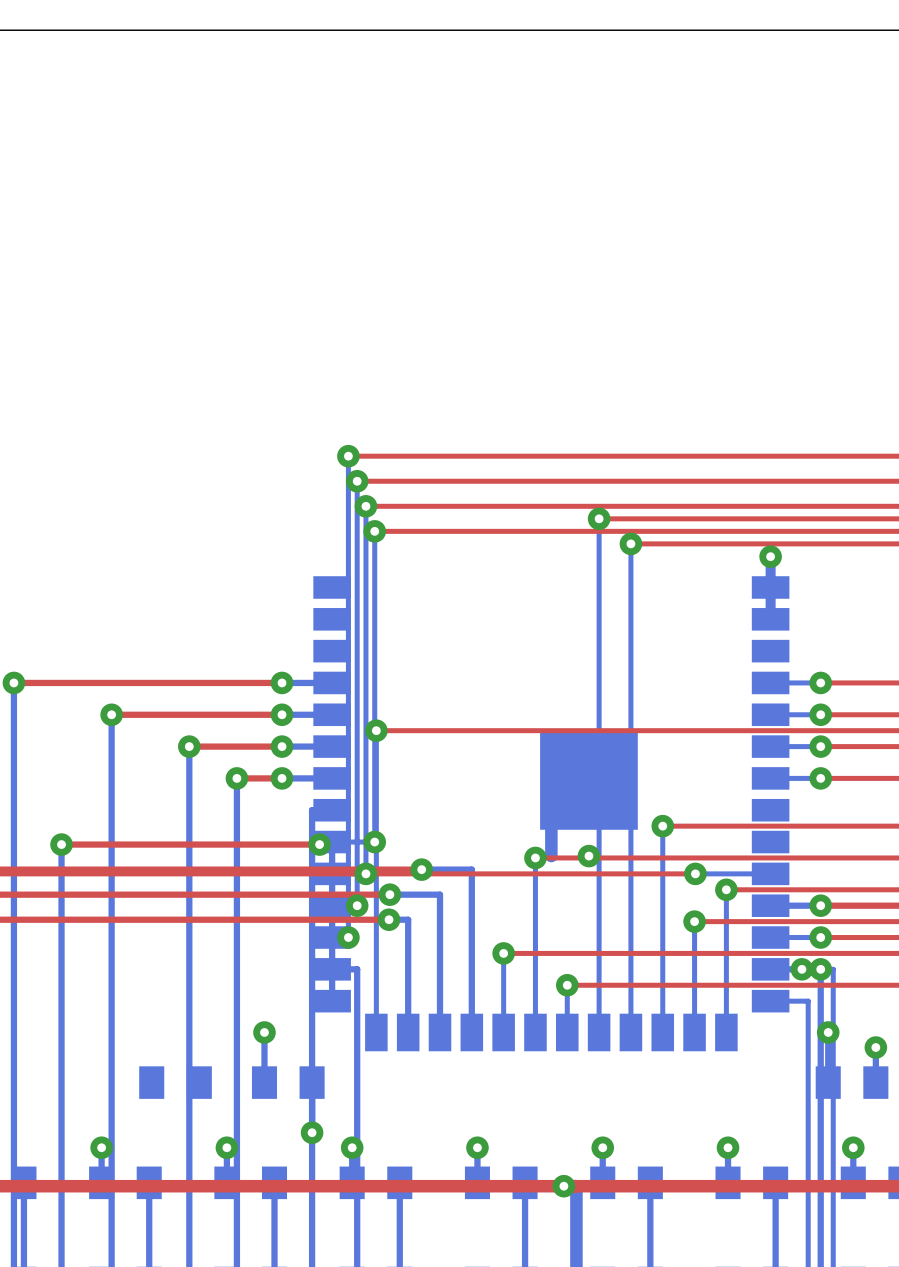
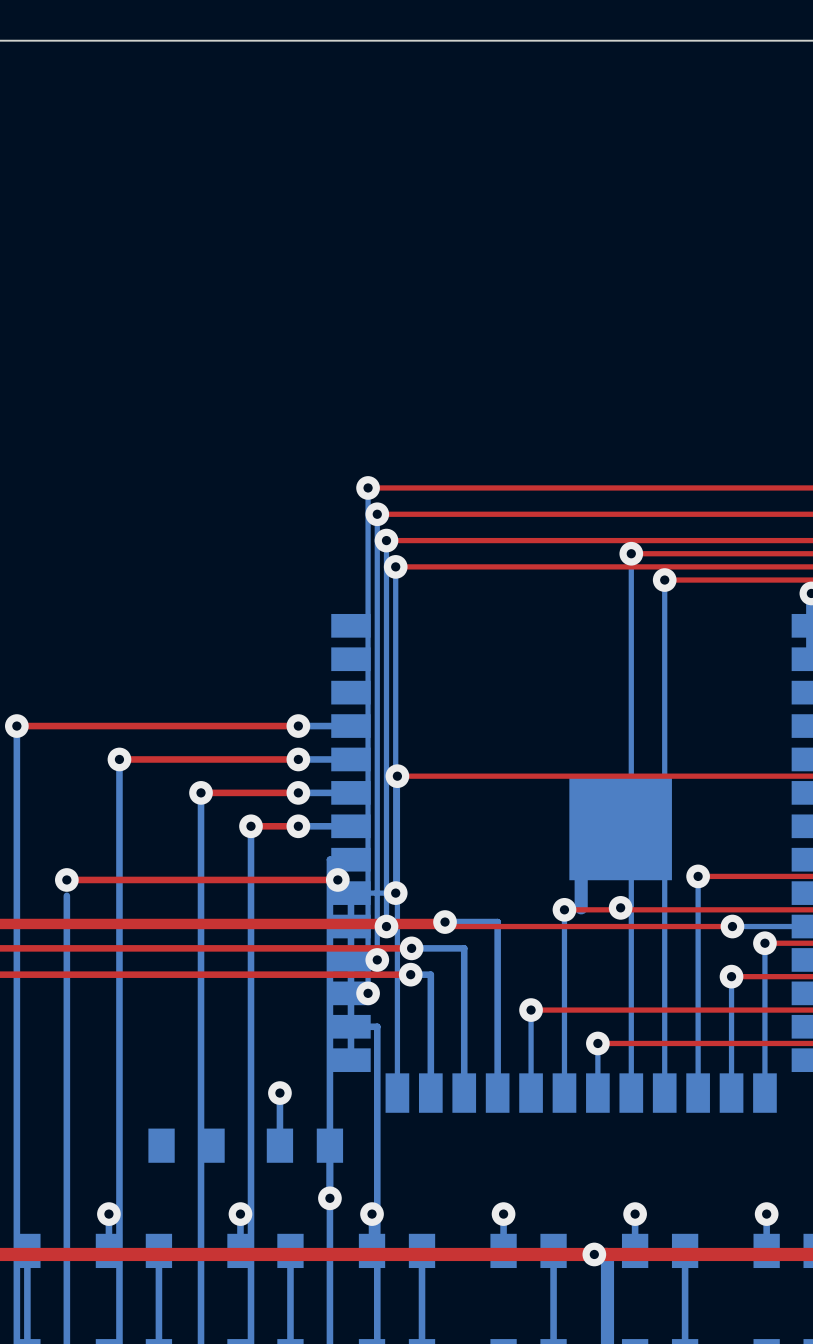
top track: (61, 844) (319, 844) -> (66, 879) (337, 879)
via position: (61, 844) -> (66, 879)
via position: (319, 844) -> (337, 879)

